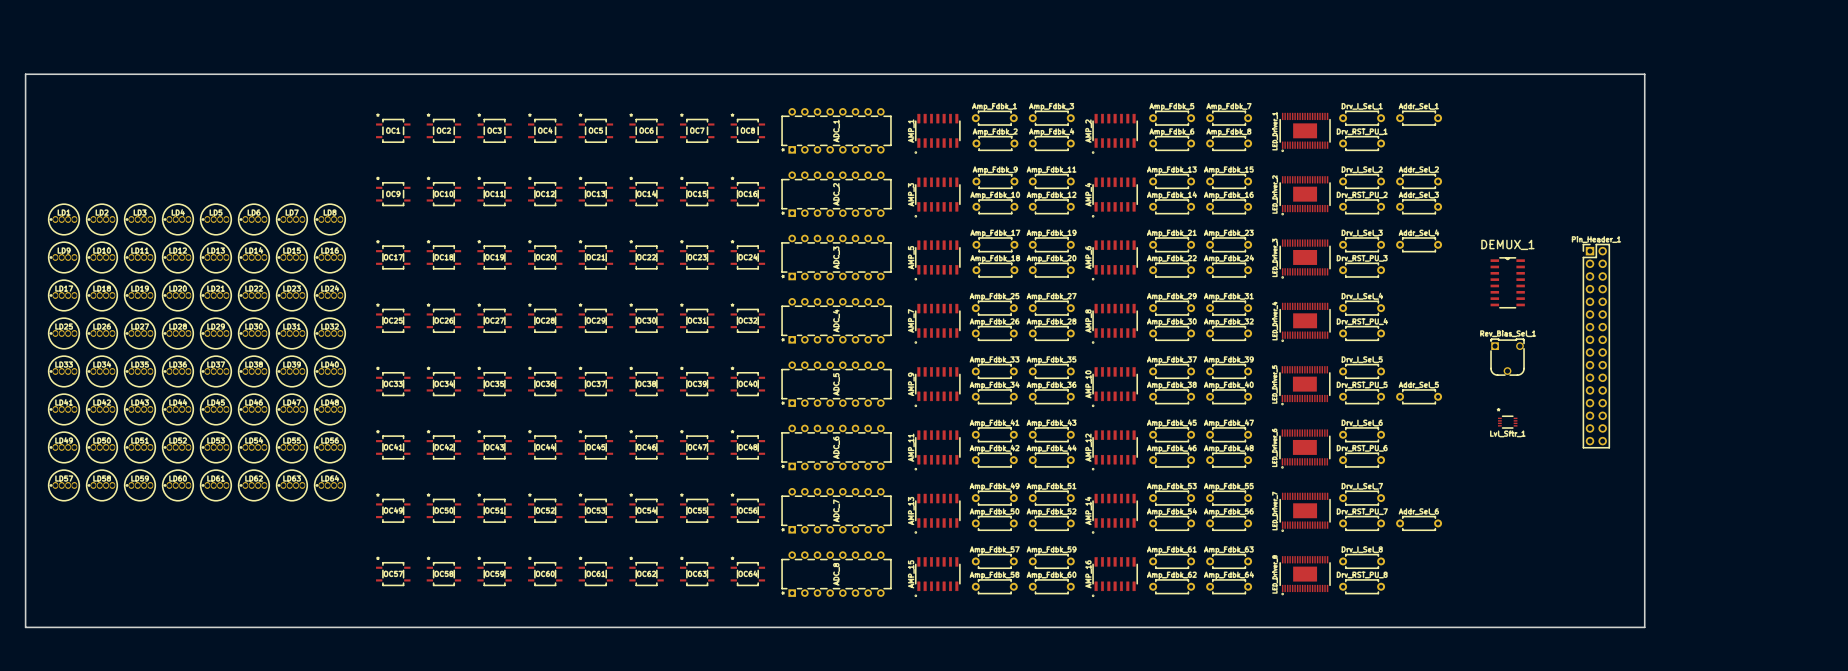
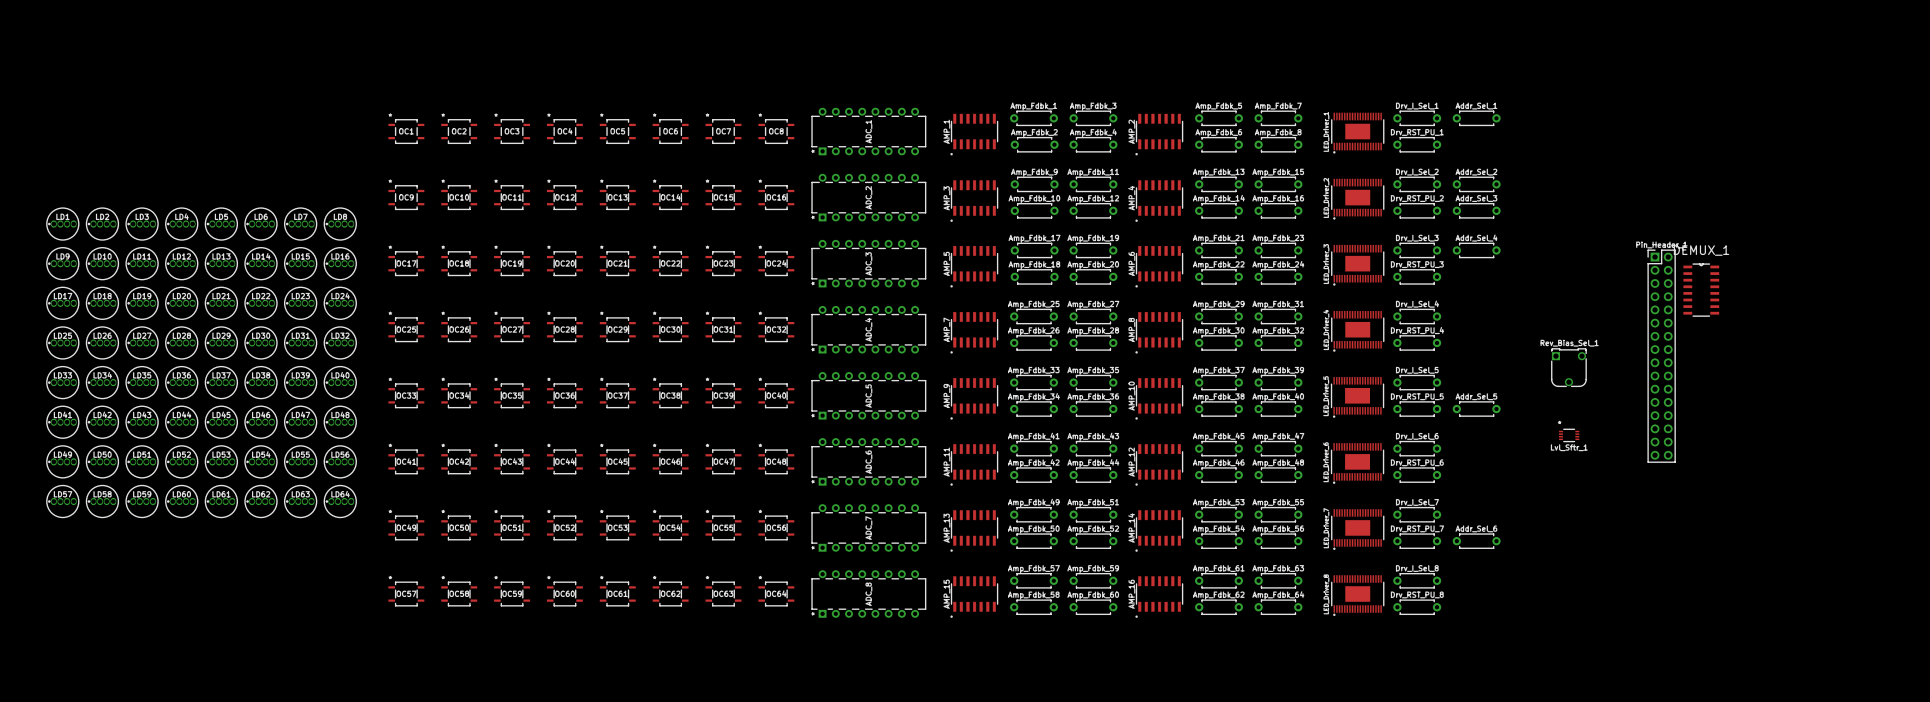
board edge: (25, 74) (1644, 74) (1644, 627) (25, 627) (25, 74) -> none
DEMUX_1 position: (1507, 282) -> (1701, 290)

